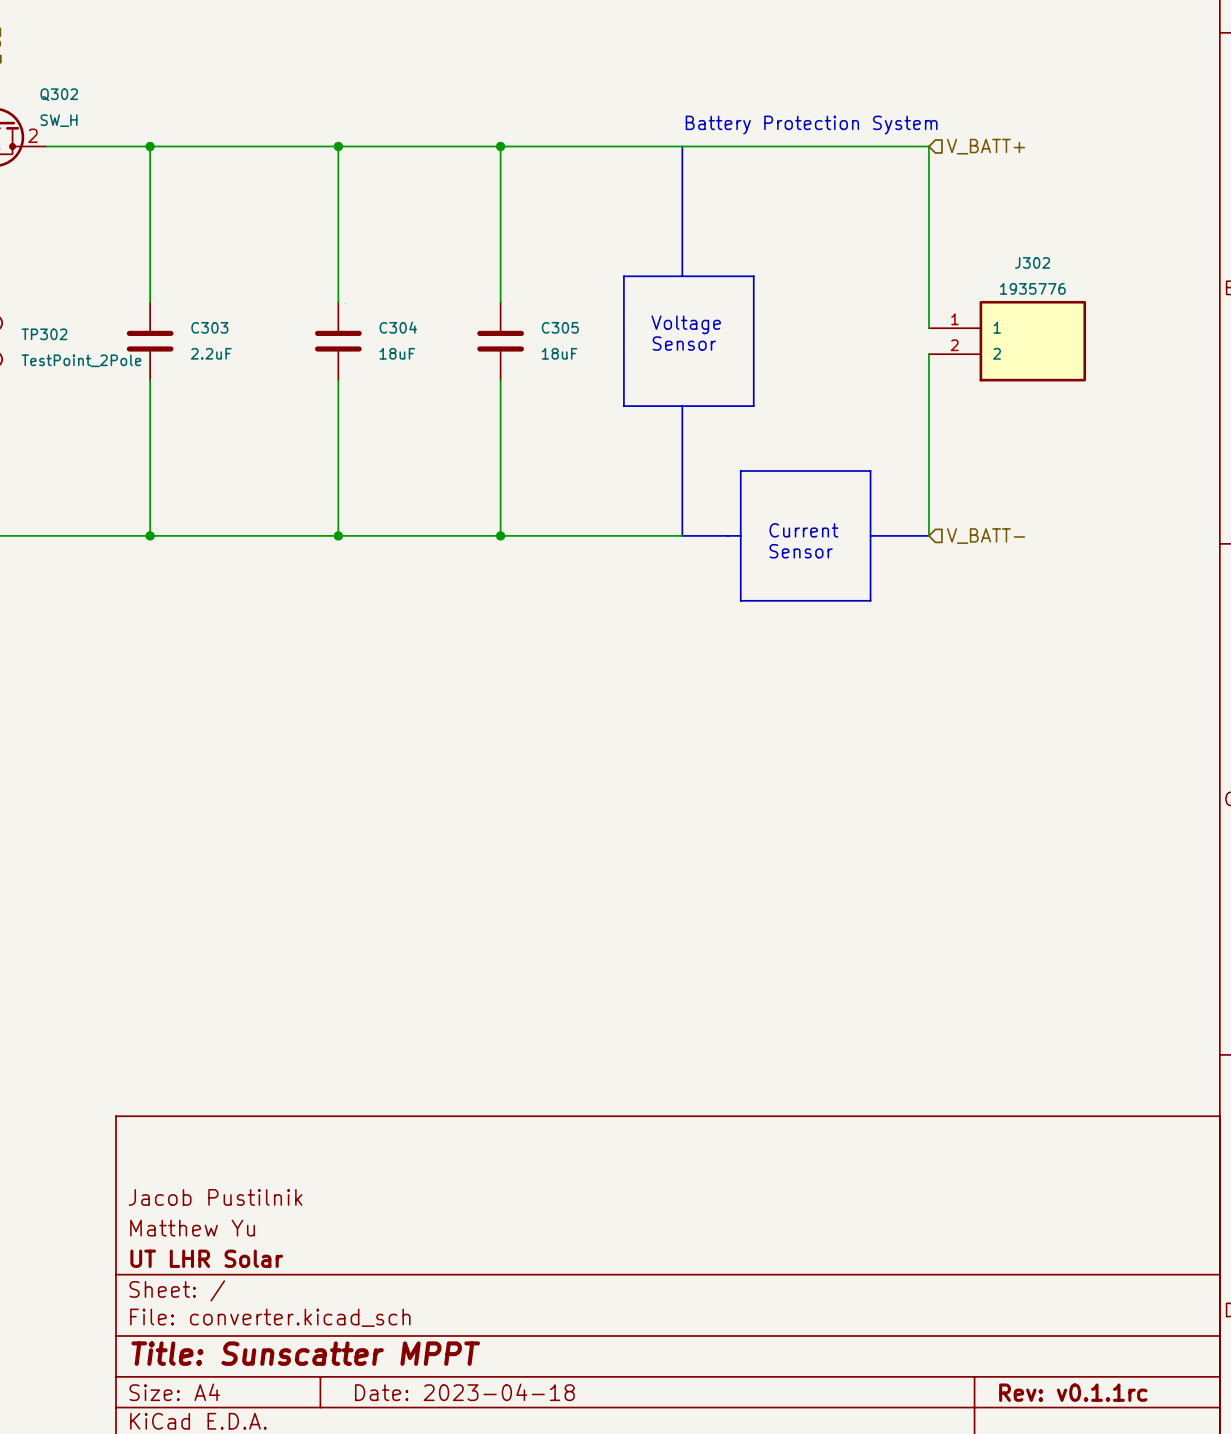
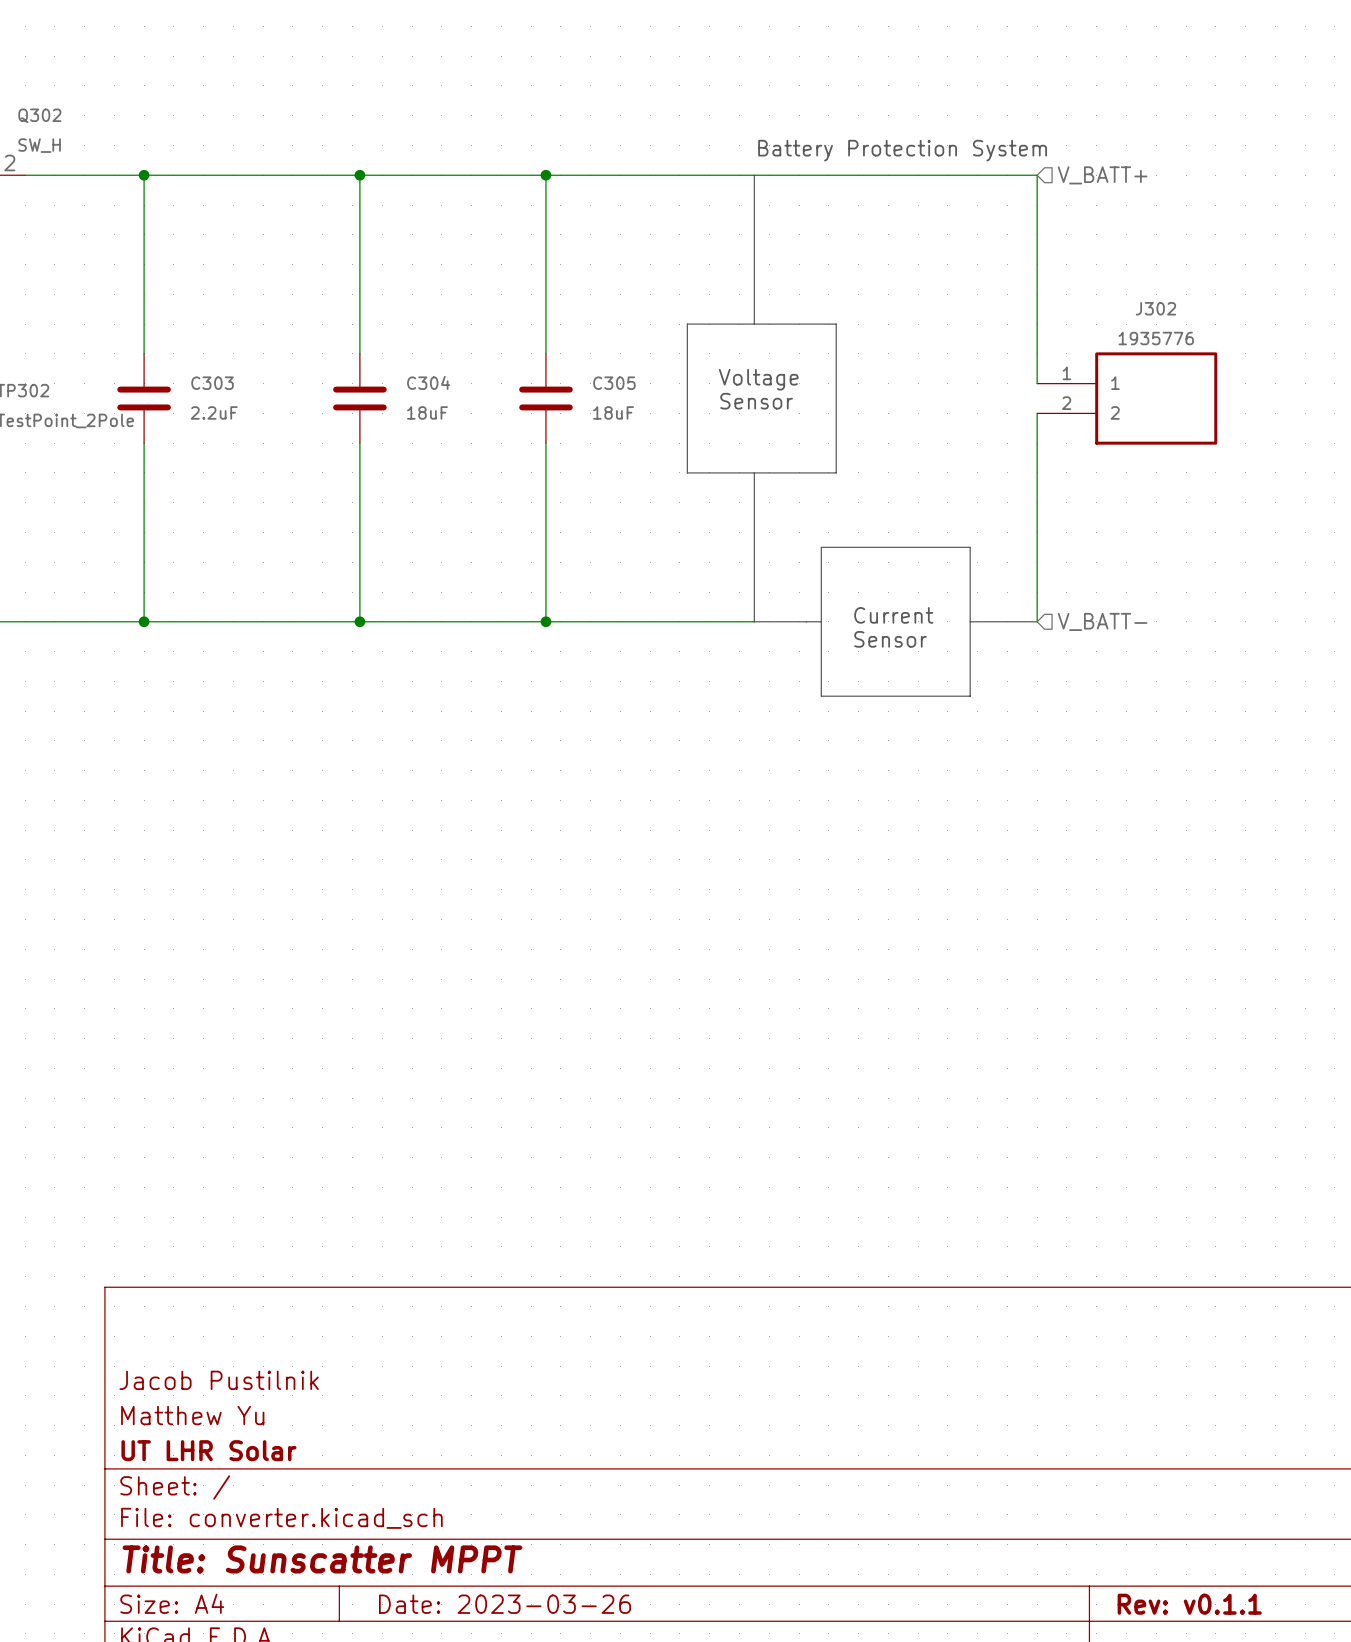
title block: Date: 2023-04-18 (464, 1392) -> Date: 2023-03-26 (505, 1604)
title block: Rev: v0.1.1rc (1073, 1392) -> Rev: v0.1.1 (1189, 1604)

